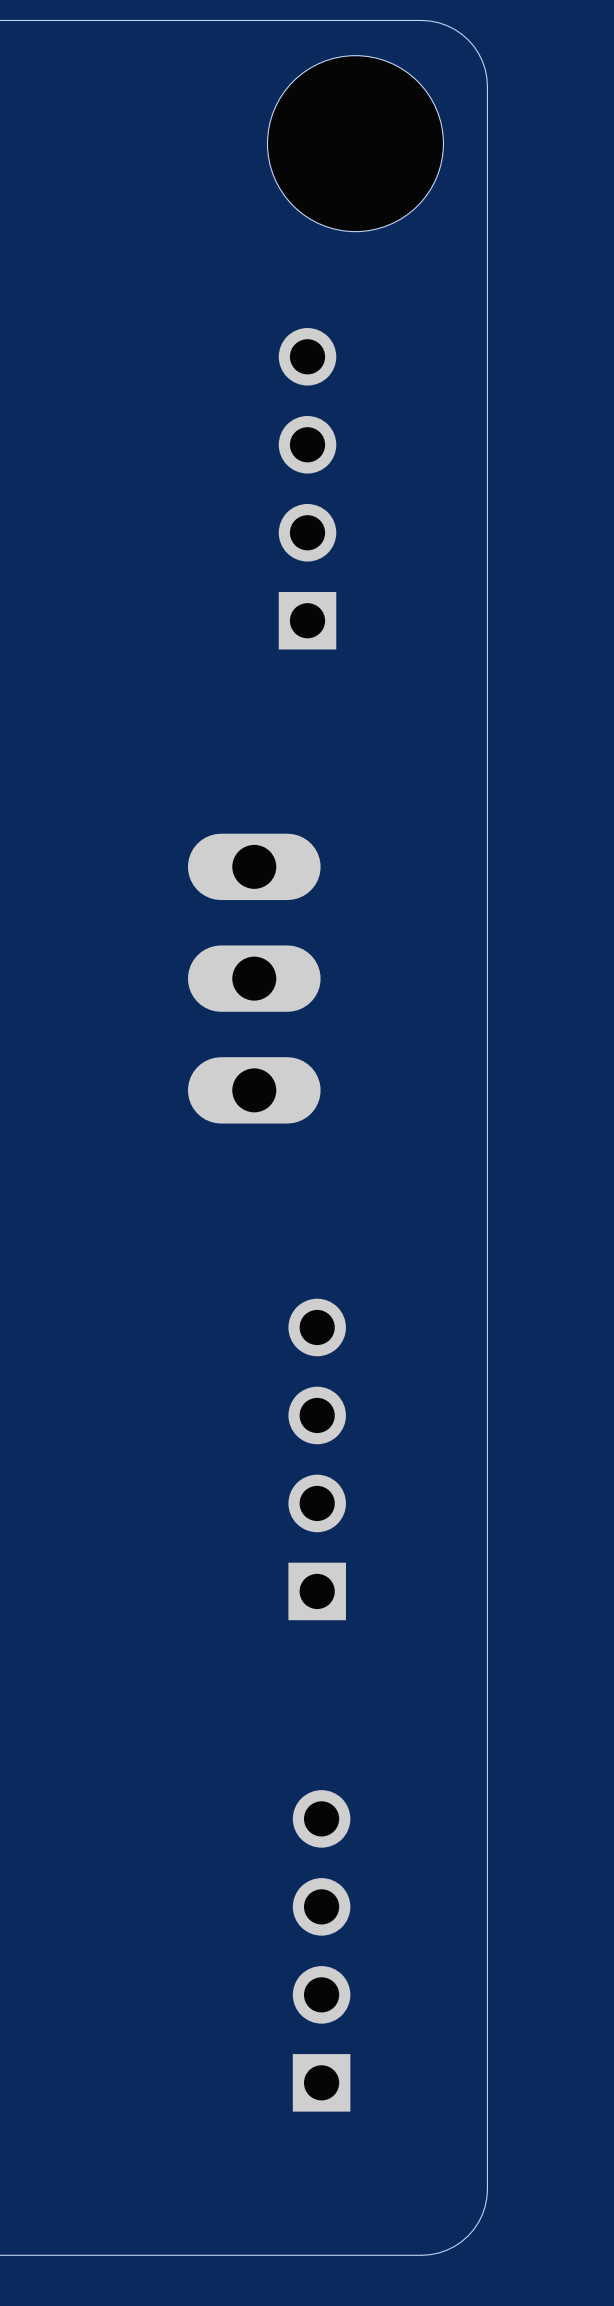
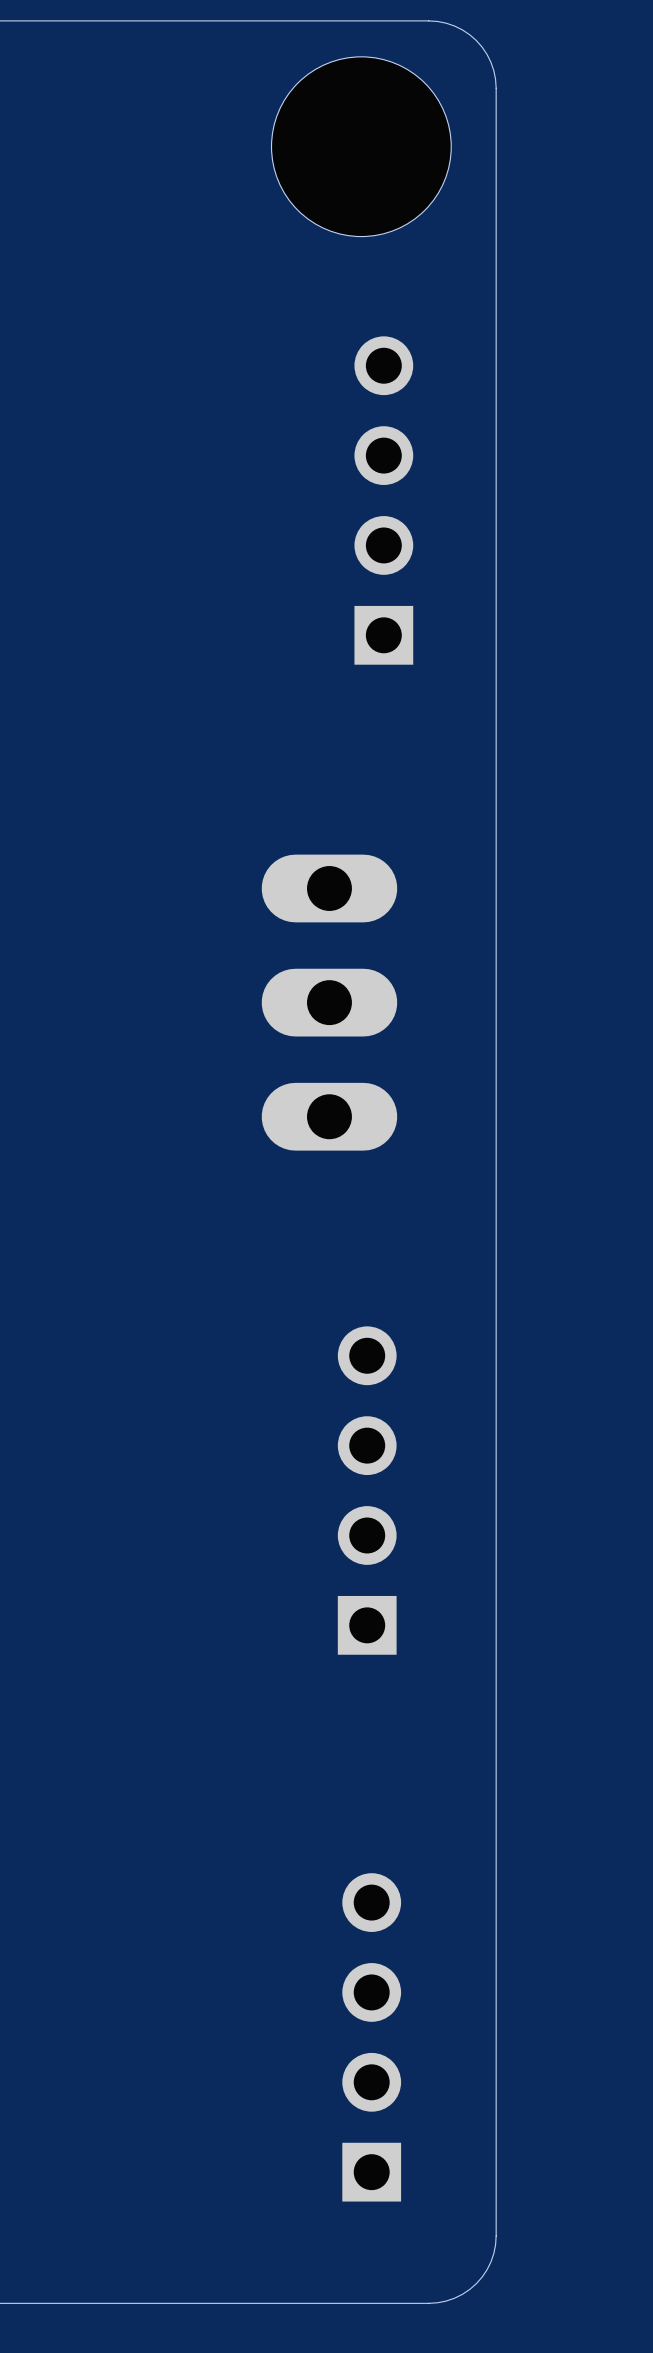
part position: (307, 488) -> (383, 500)
part position: (254, 978) -> (329, 1002)
part position: (317, 1459) -> (367, 1490)
part position: (321, 1950) -> (371, 2037)

